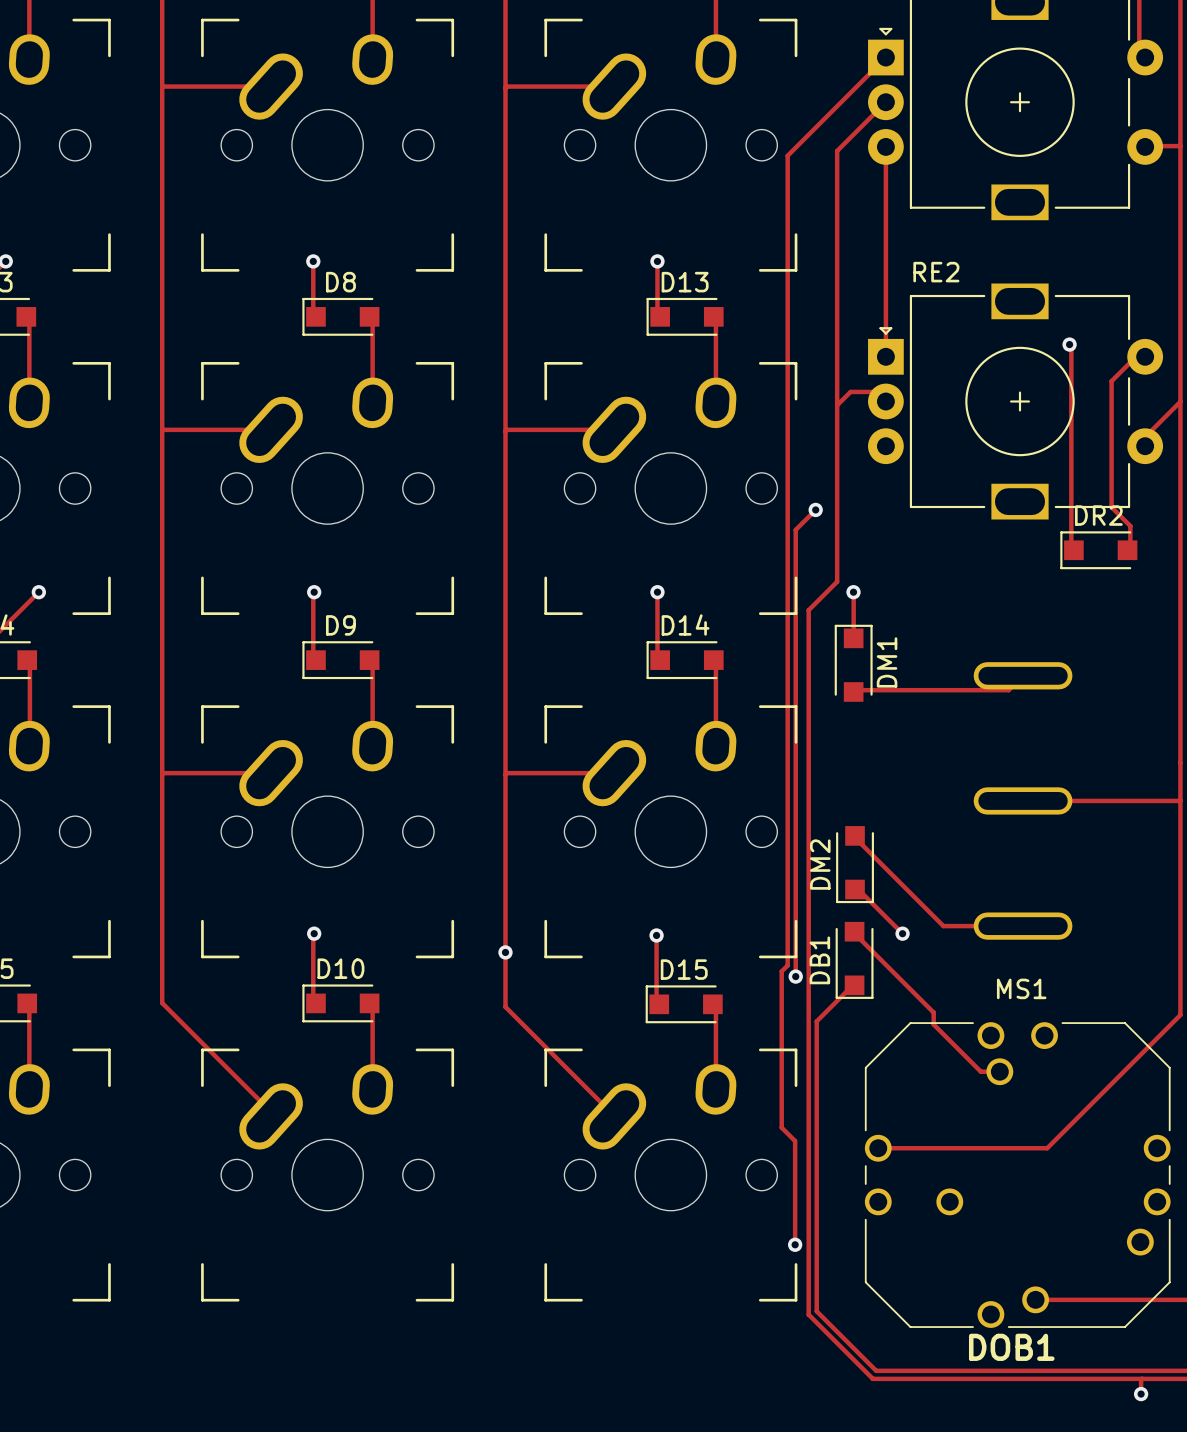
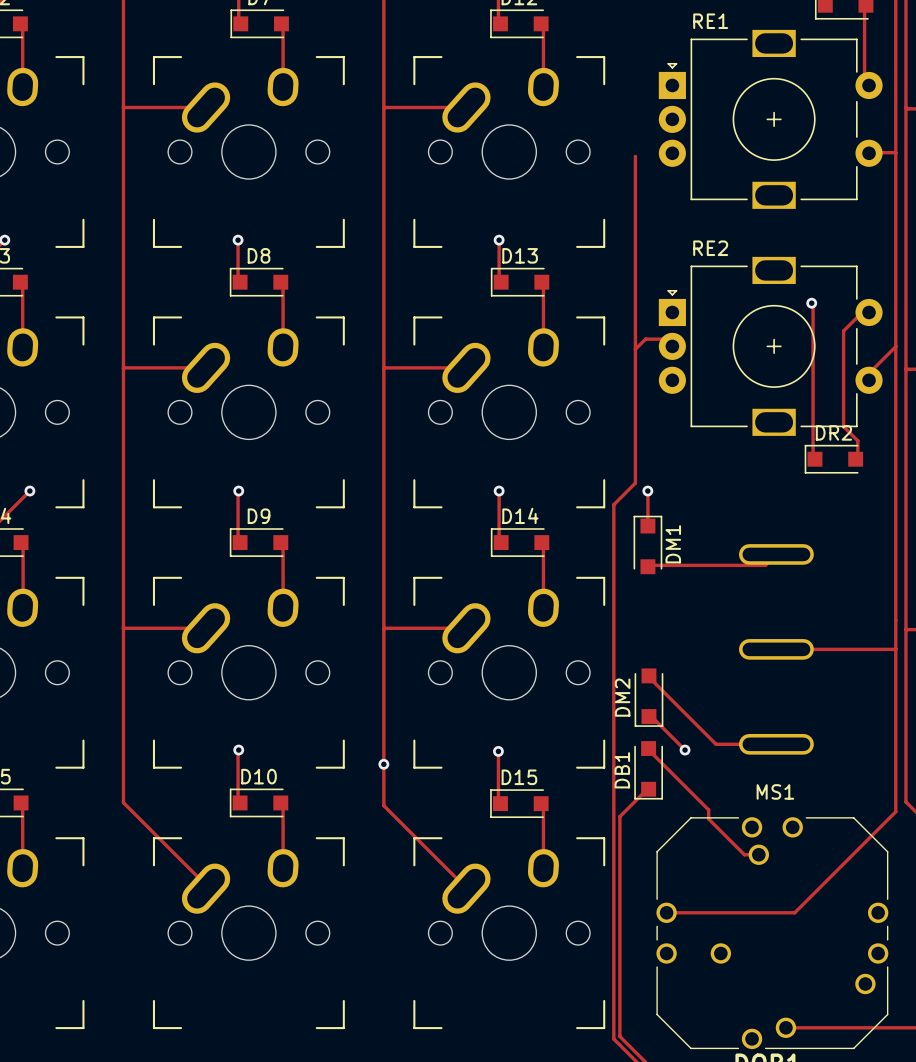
track: (885, 57) (787, 155) (787, 965) (781, 971) (781, 1127) (795, 1141) (795, 1244) -> none
track: (885, 102) (837, 150) -> none
track: (885, 146) (885, 356) -> none
track: (815, 509) (795, 529) (795, 976) -> none
via: (815, 509) -> none
via: (795, 976) -> none
via: (795, 1244) -> none

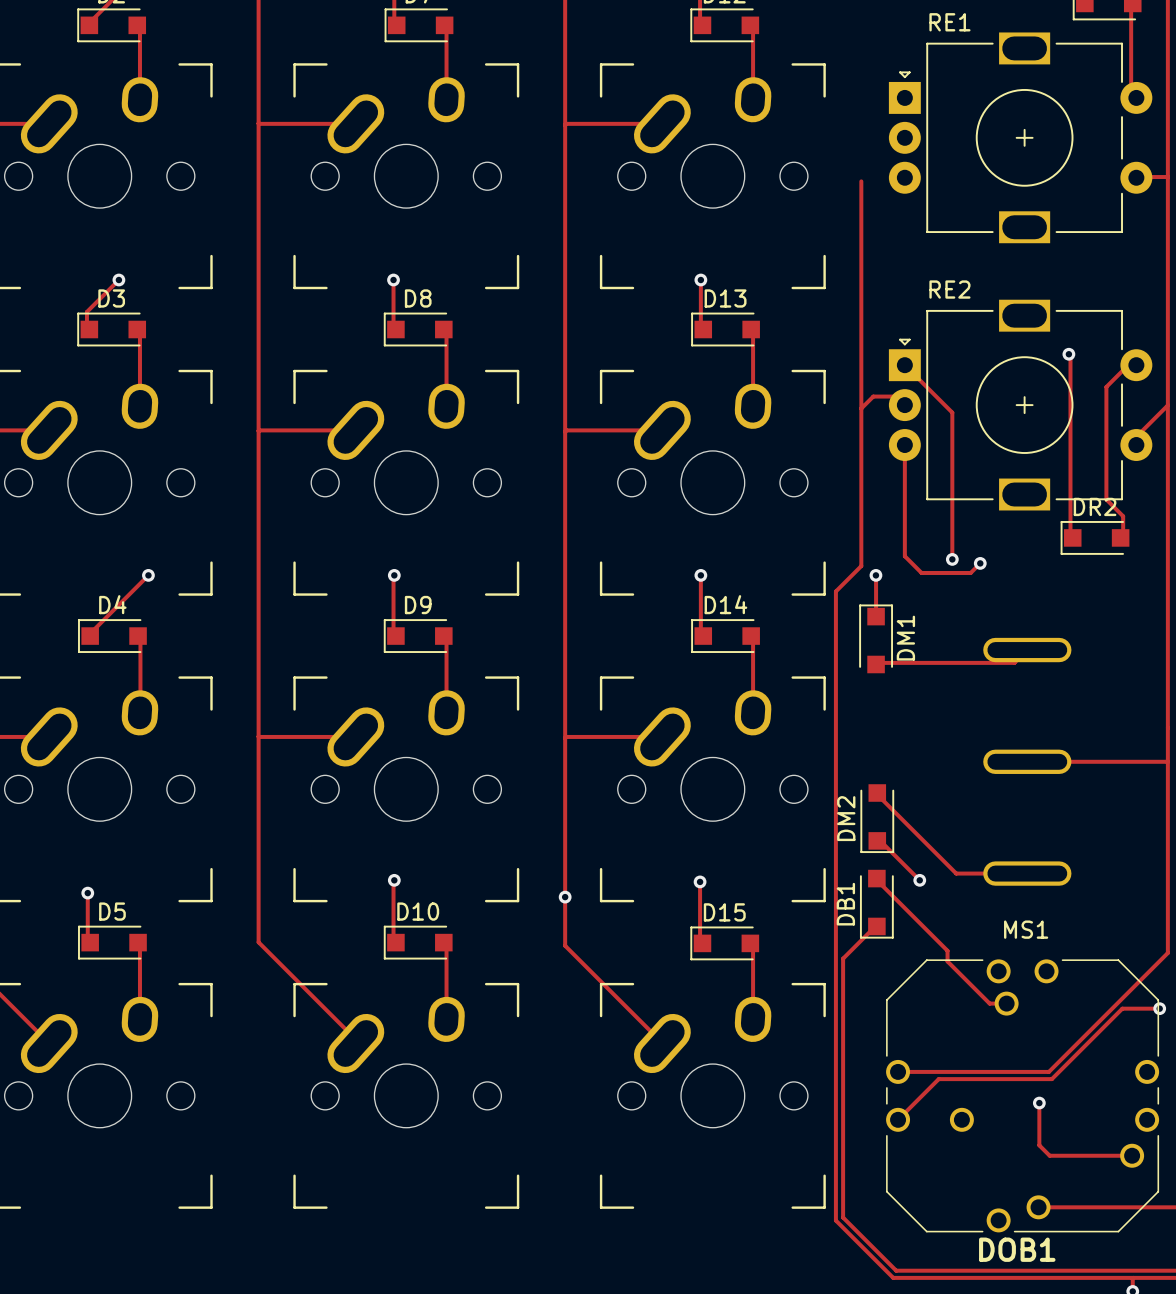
track: none -> (904, 365) (952, 412) (952, 559)
track: none -> (904, 445) (904, 556) (921, 572) (970, 572) (980, 563)
via: none -> (952, 559)
via: none -> (980, 563)
track: none -> (1159, 1008) (1122, 1008) (1051, 1079) (938, 1079) (898, 1119)
via: none -> (1159, 1008)
track: none -> (1039, 1103) (1039, 1145) (1049, 1155) (1132, 1155)
via: none -> (1039, 1103)

